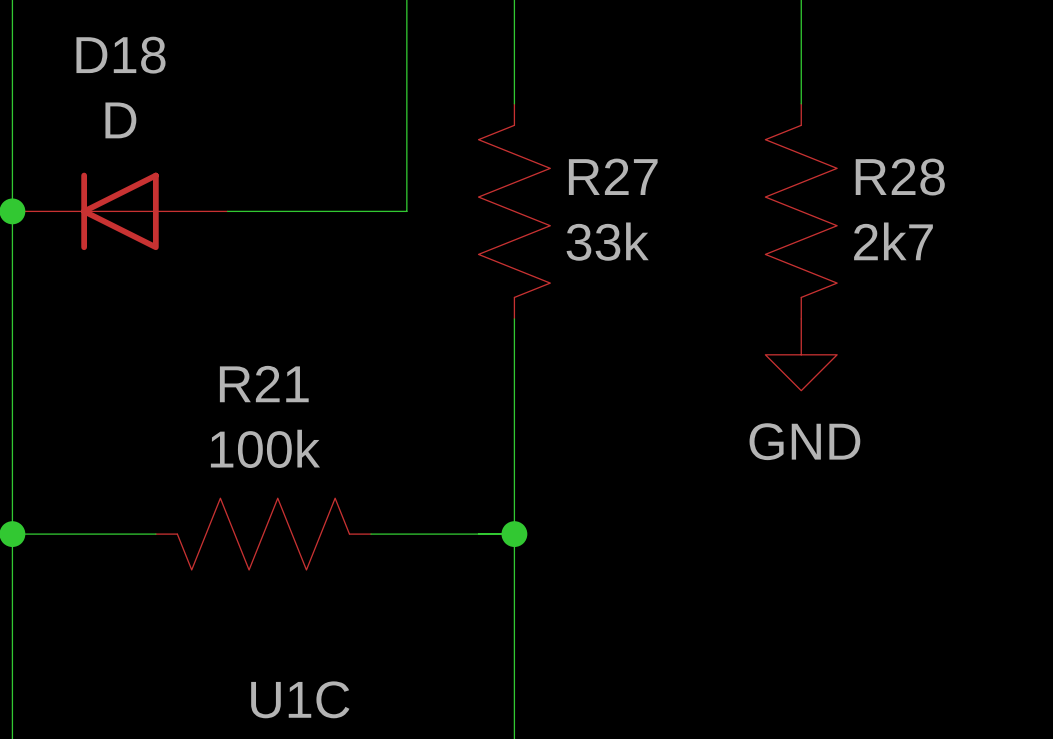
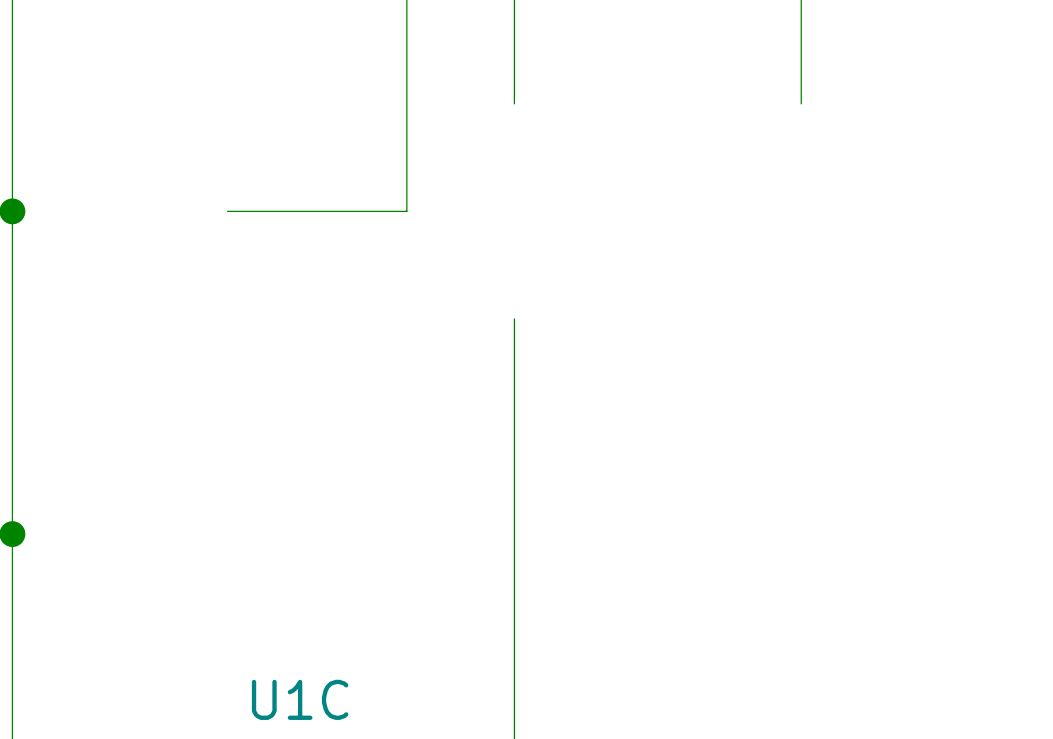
D18: D (119, 211) -> none
R27: 33k (514, 211) -> none
R28: 2k7 (801, 211) -> none
power symbol: GND (801, 354) -> none
wire: (12, 534) (155, 534) -> none
R21: 100k (263, 534) -> none
wire: (370, 534) (514, 534) -> none
junction: (514, 534) -> none

